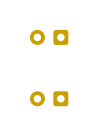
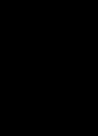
part: (49, 37) -> none
part: (49, 98) -> none

